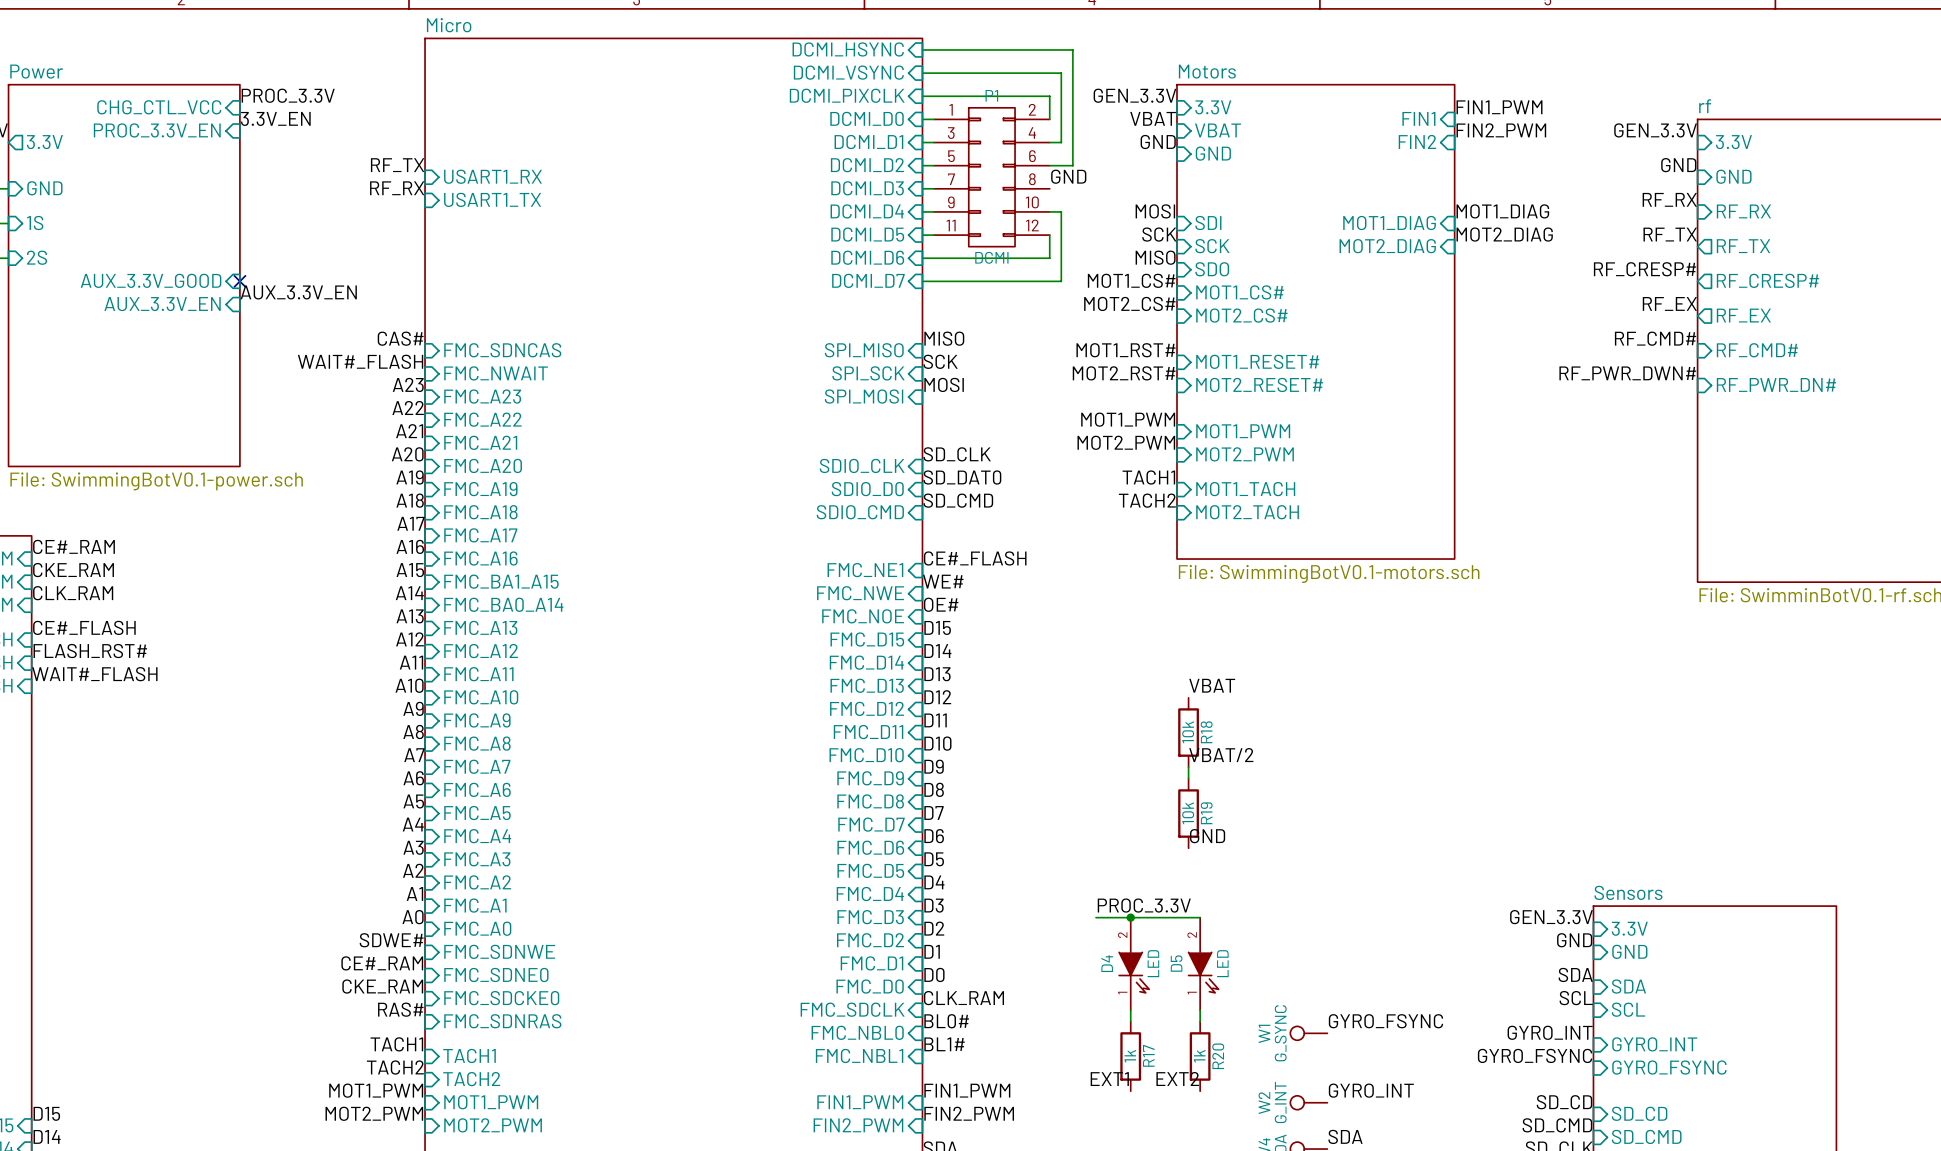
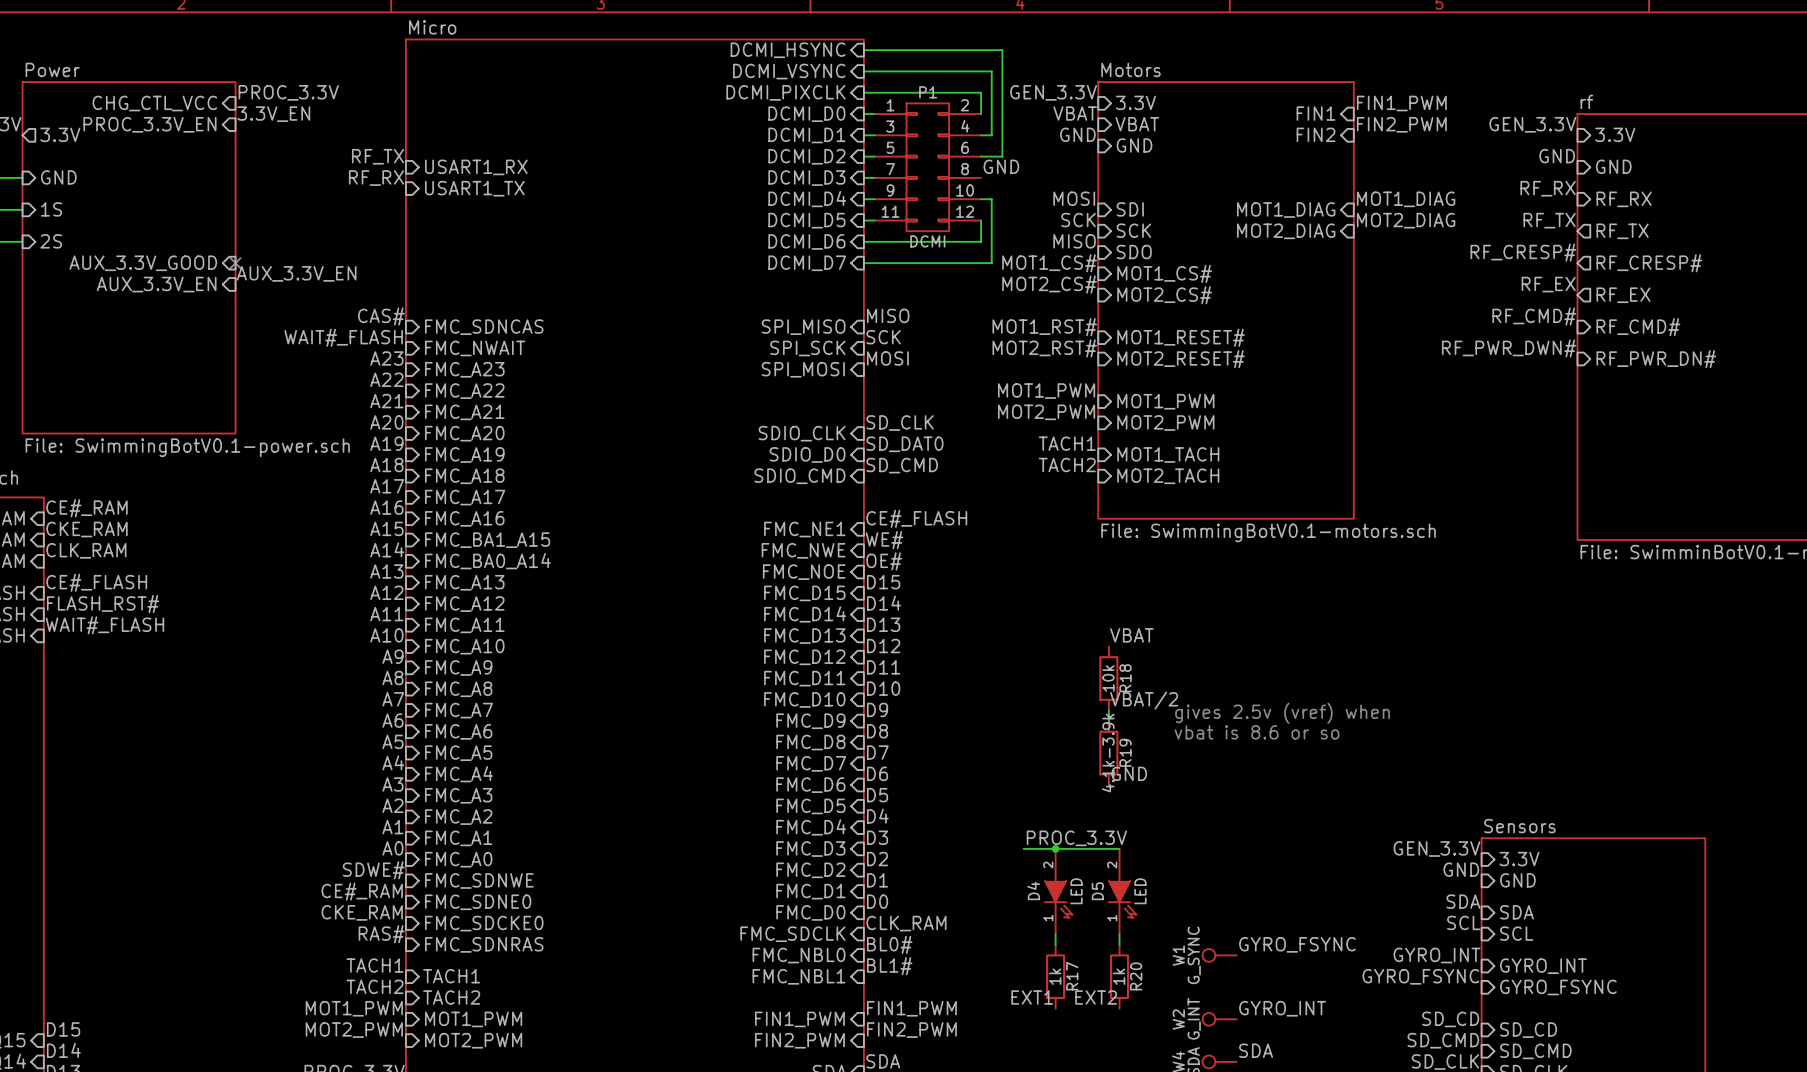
text: none -> gives 2.5v (vref) when (1282, 713)
text: none -> vbat is 8.6 or so (1256, 732)
R19 value: 10k (1188, 813) -> 4.1k-3.9k (1108, 753)

